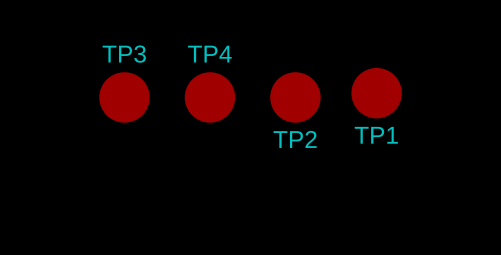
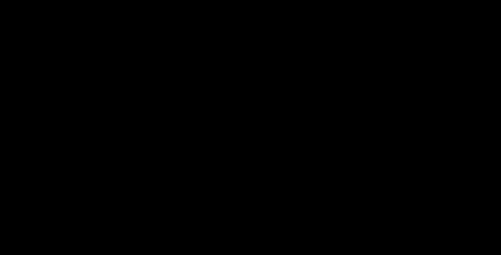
TP1: (376, 93) -> none
TP3: (124, 97) -> none
TP4: (209, 97) -> none
TP2: (295, 97) -> none

